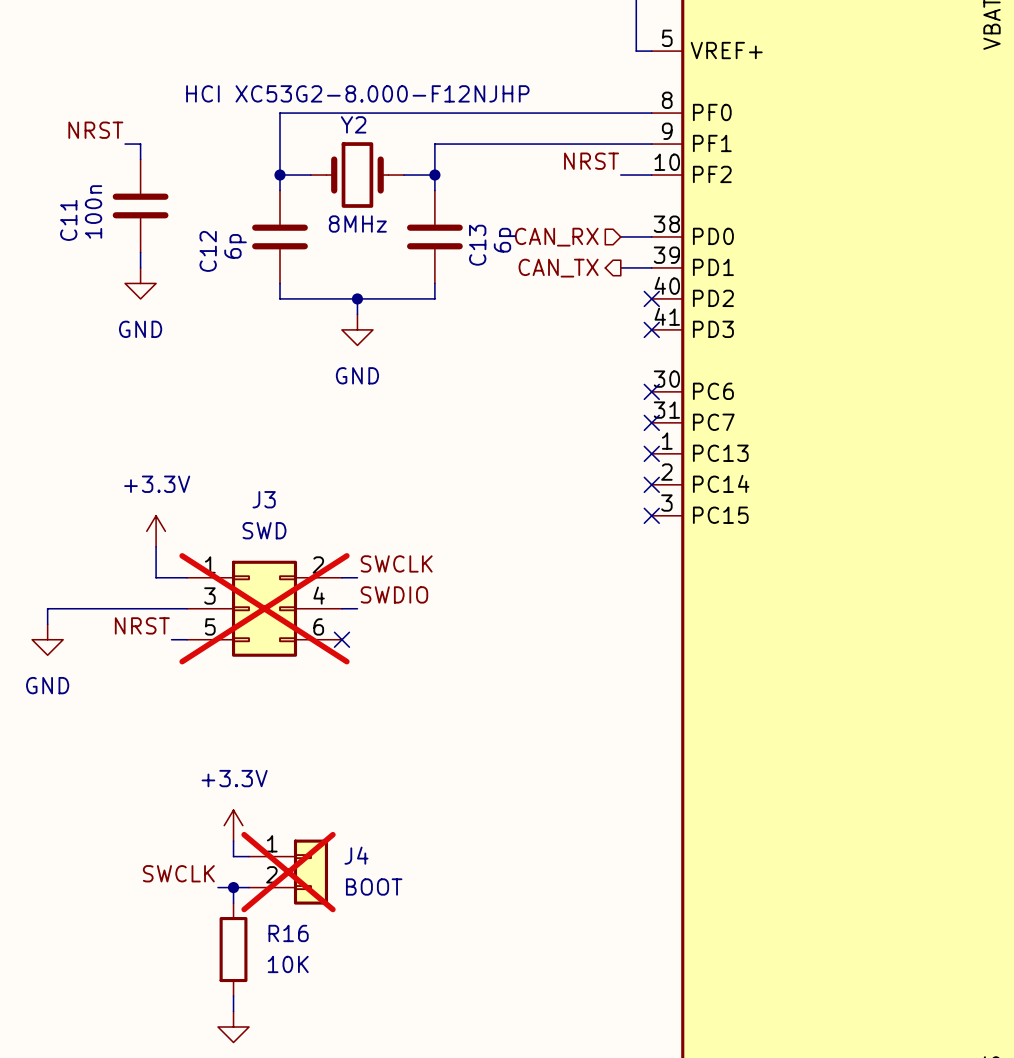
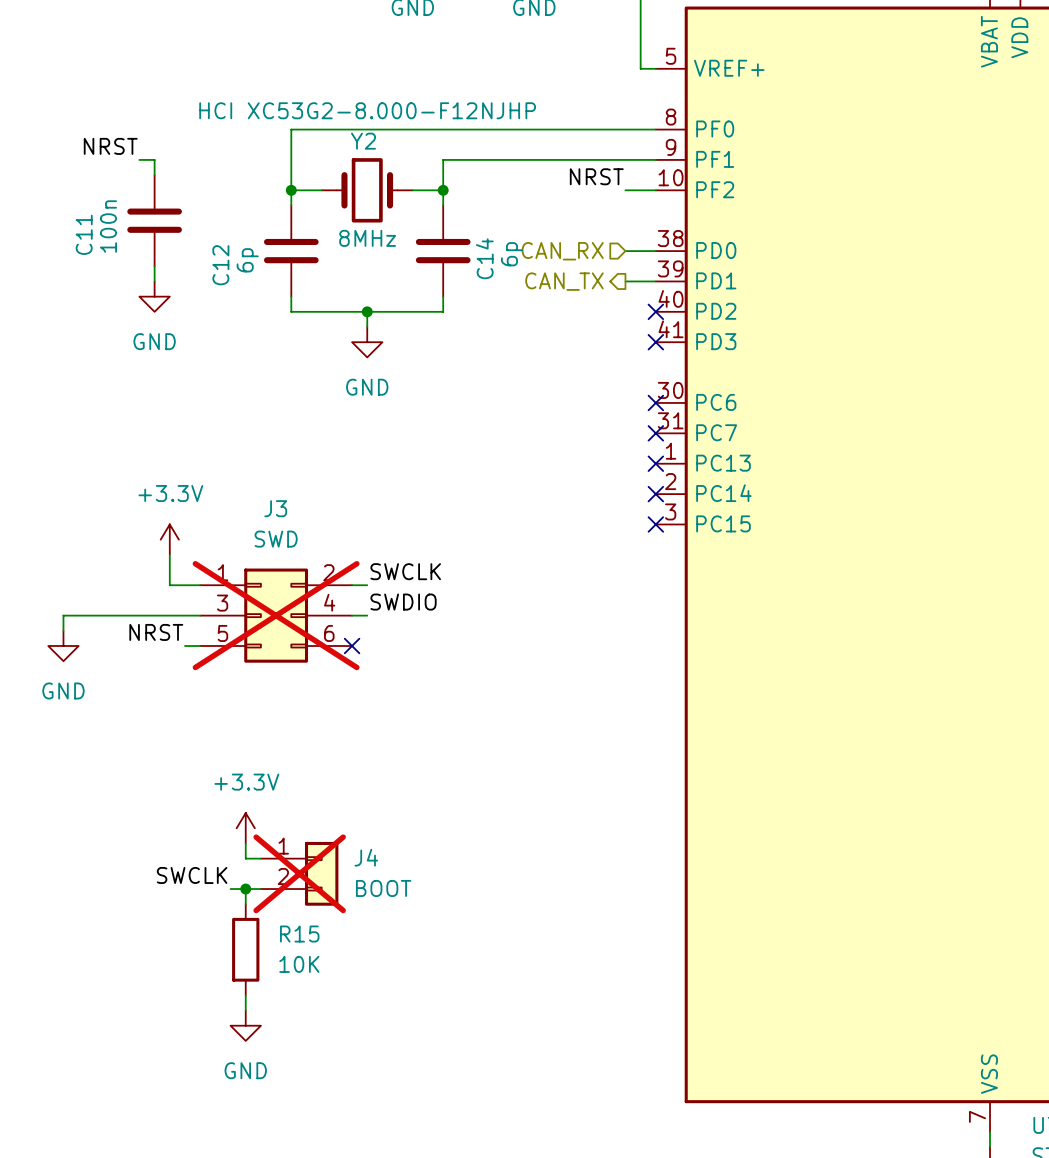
C13 name: C13 (477, 245) -> C14 (484, 258)
R16 name: R16 (288, 933) -> R15 (299, 934)

